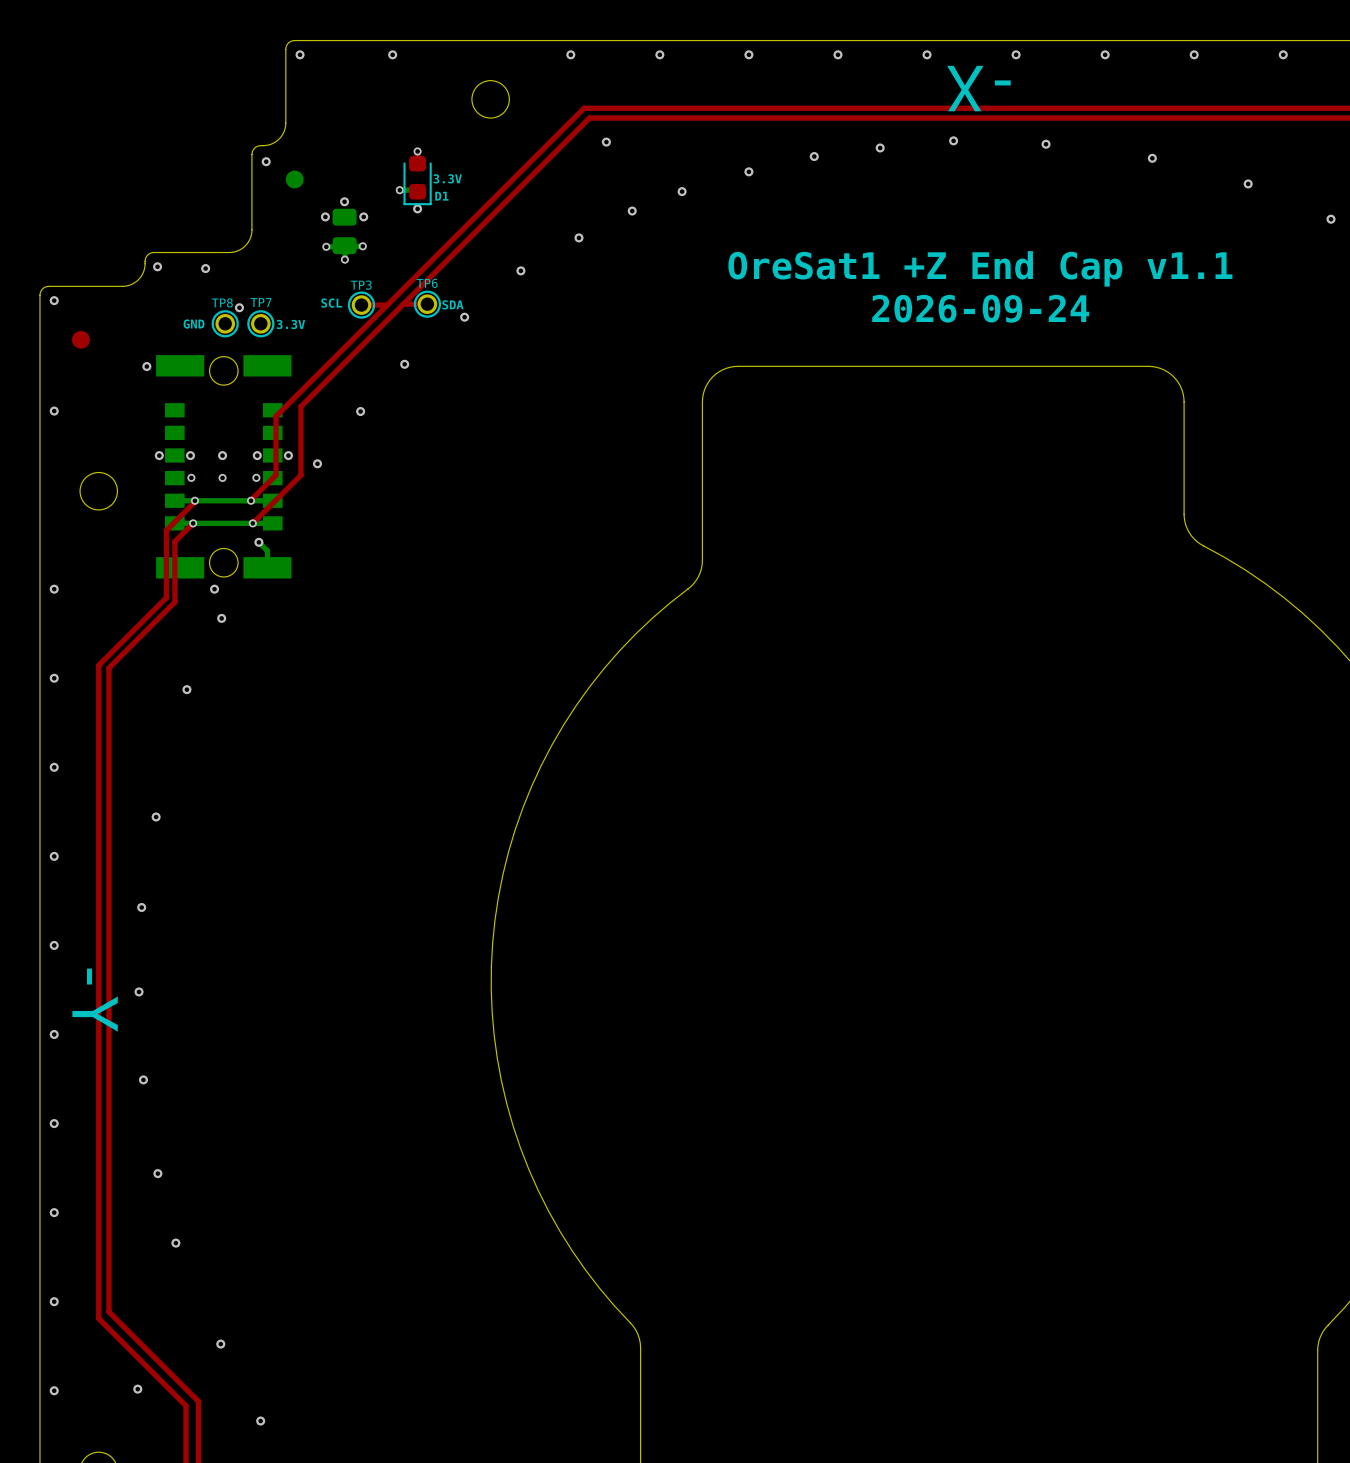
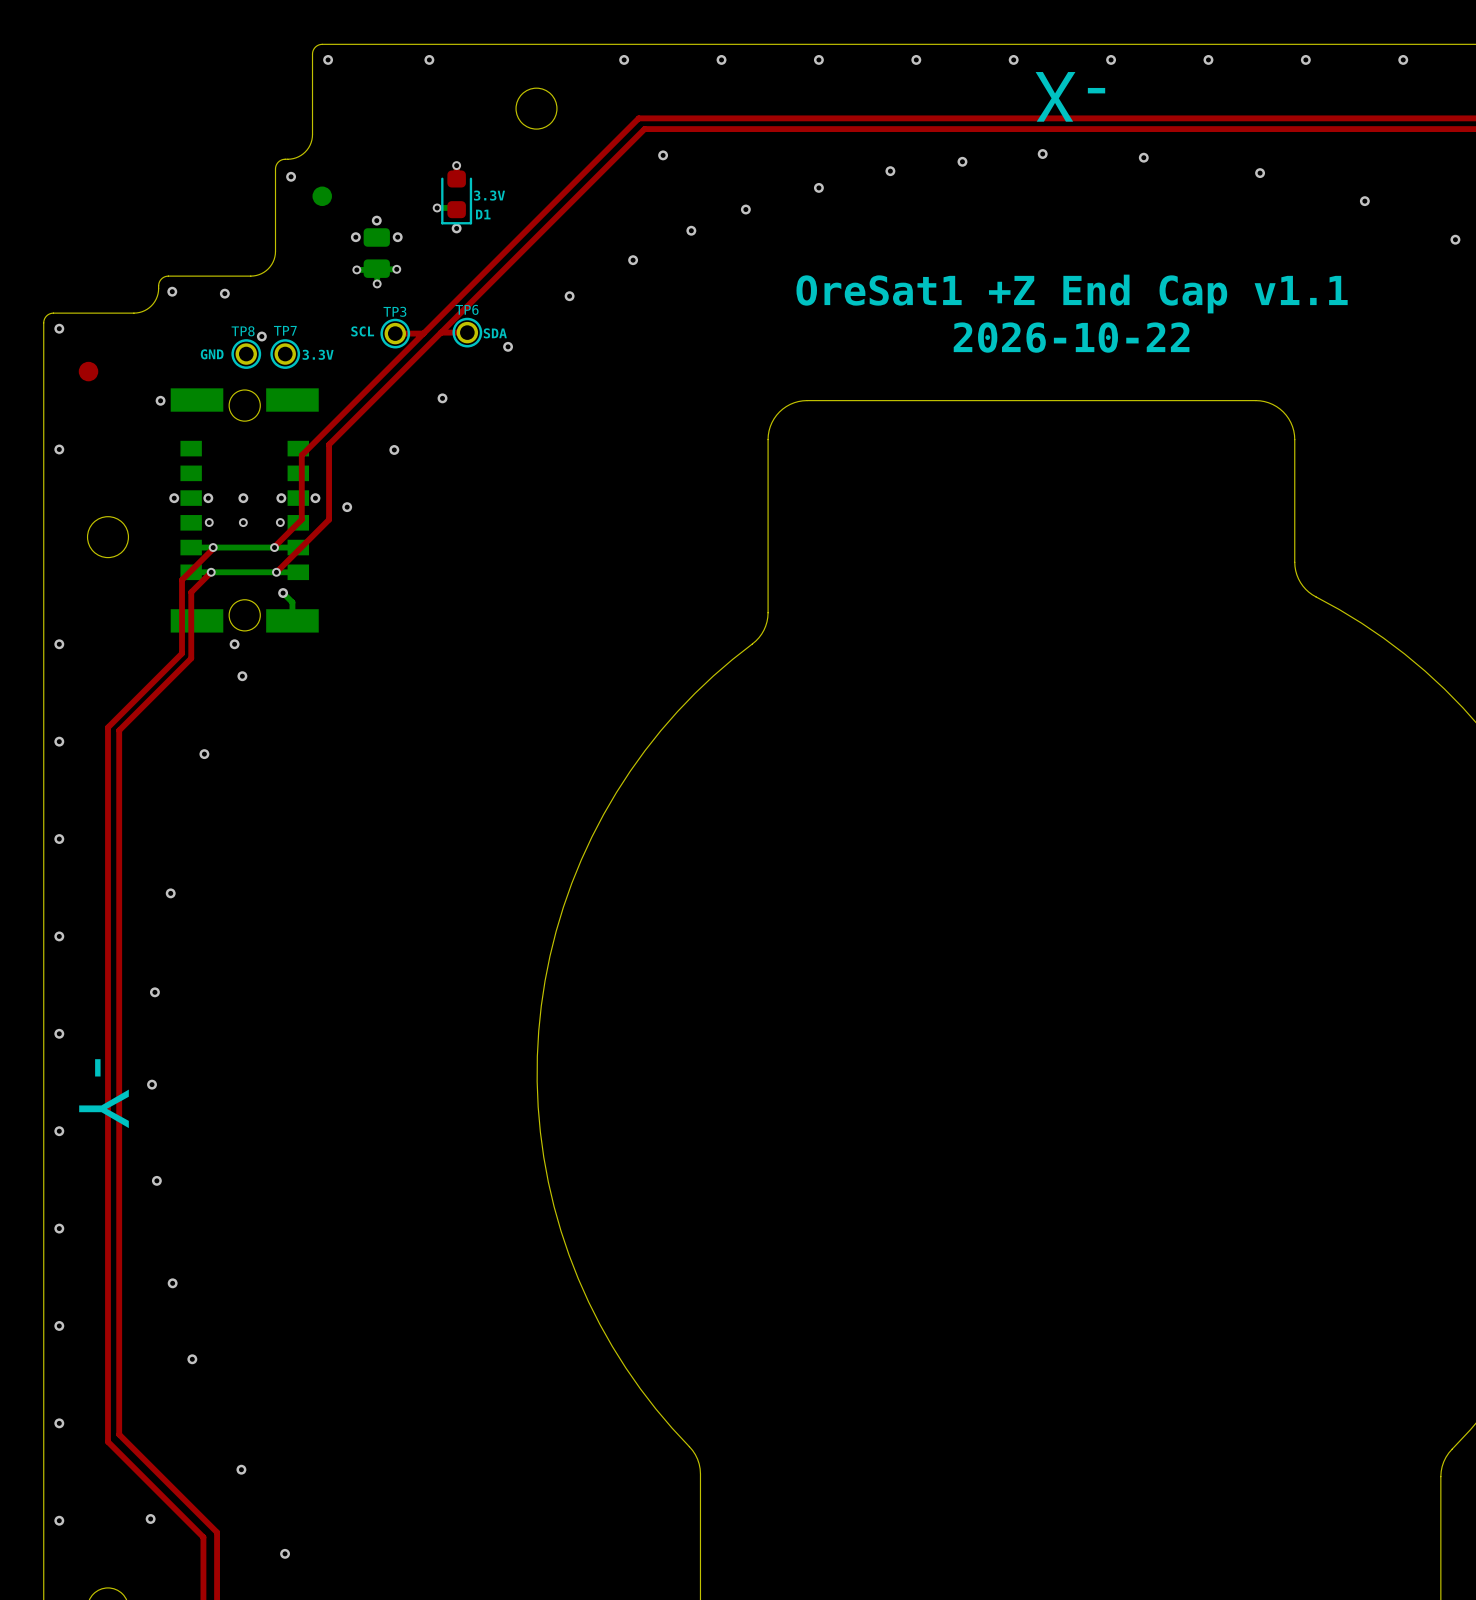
text: 2026-09-24 (980, 308) -> 2026-10-22 (1071, 337)

